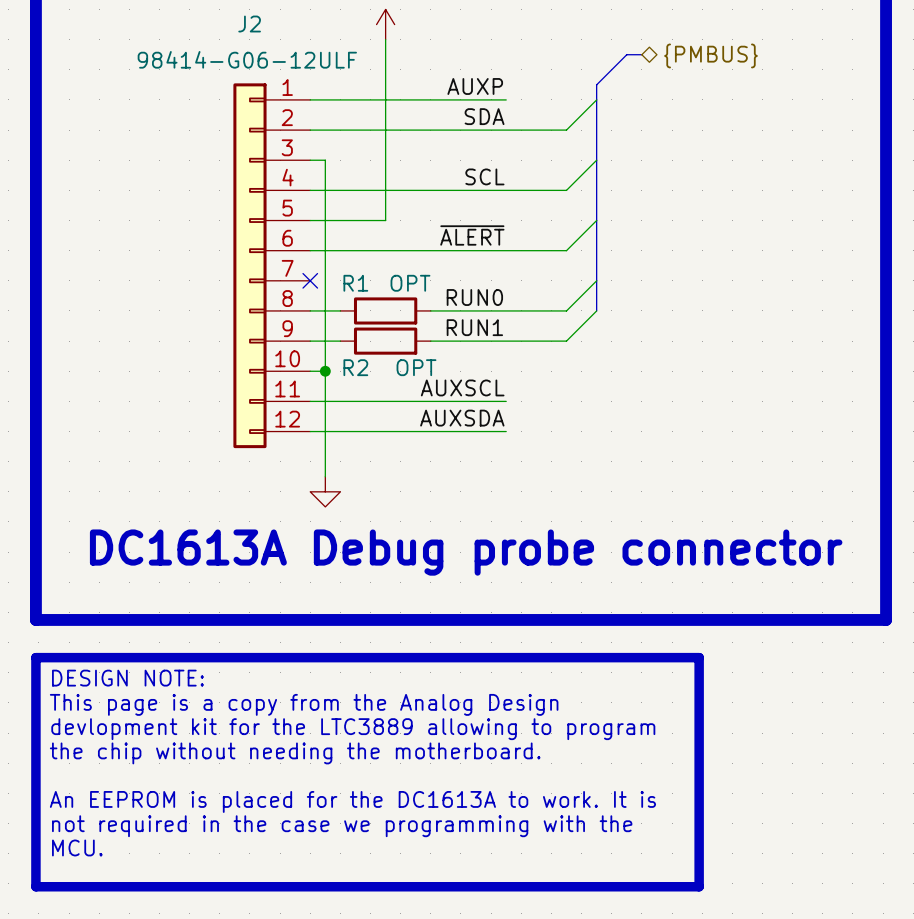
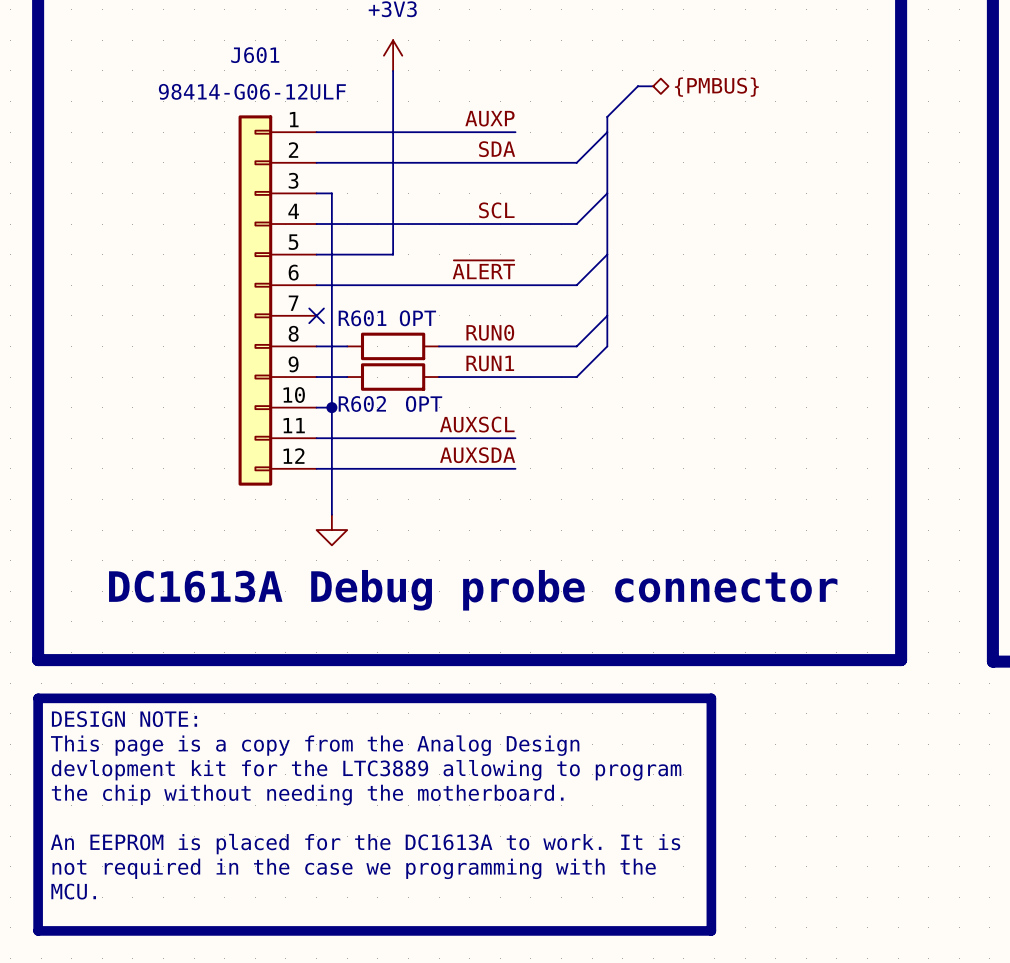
J2 name: J2 (249, 24) -> J601 (255, 55)
R1 name: R1 (355, 283) -> R601 (362, 318)
R2 name: R2 (355, 367) -> R602 (362, 404)

